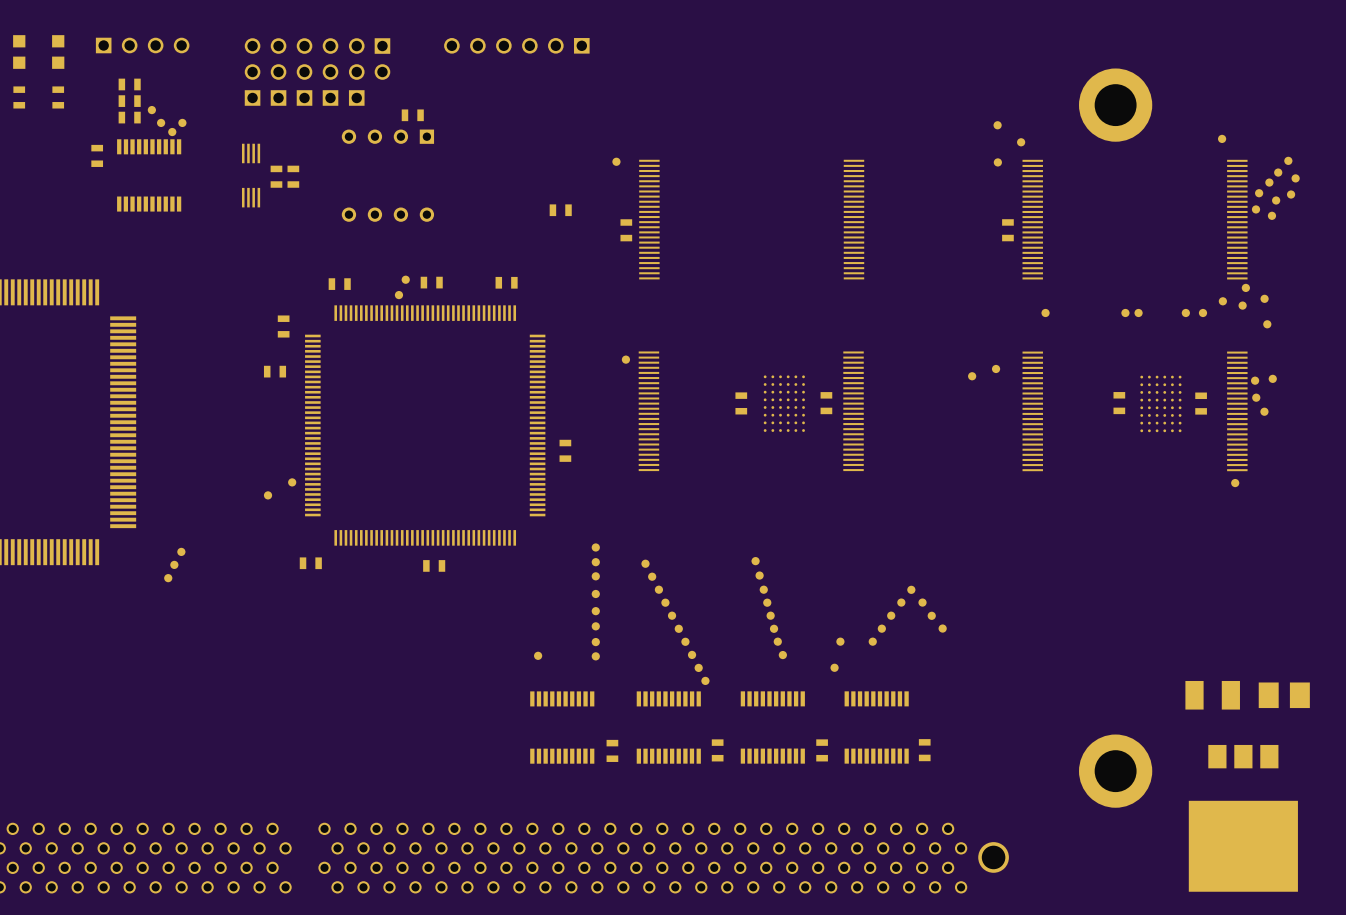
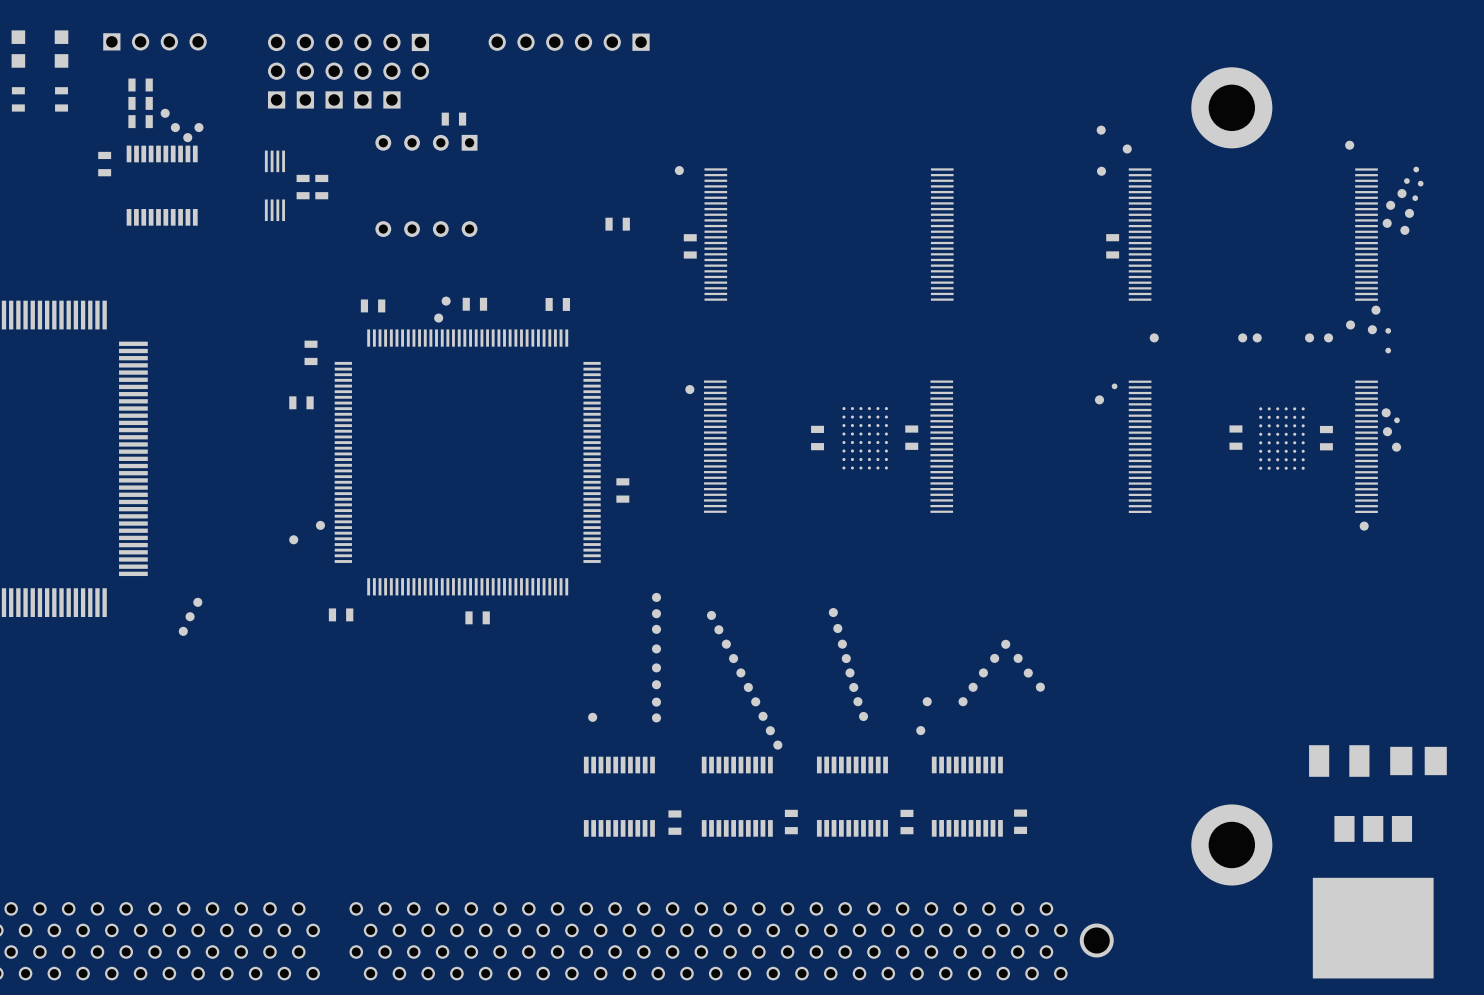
part: none -> (1416, 169)
part: (1288, 160) -> none
part: none -> (1406, 181)
part: (1278, 172) -> none
part: none -> (1420, 183)
part: (1295, 178) -> none
part: none -> (1415, 198)
part: (1291, 194) -> none
part: (1264, 298) -> none
part: none -> (1388, 330)
part: none -> (1388, 350)
part: (1267, 324) -> none
part: none -> (1114, 386)
part: (972, 376) -> none
part: (1272, 378) -> none
part: none -> (1396, 420)

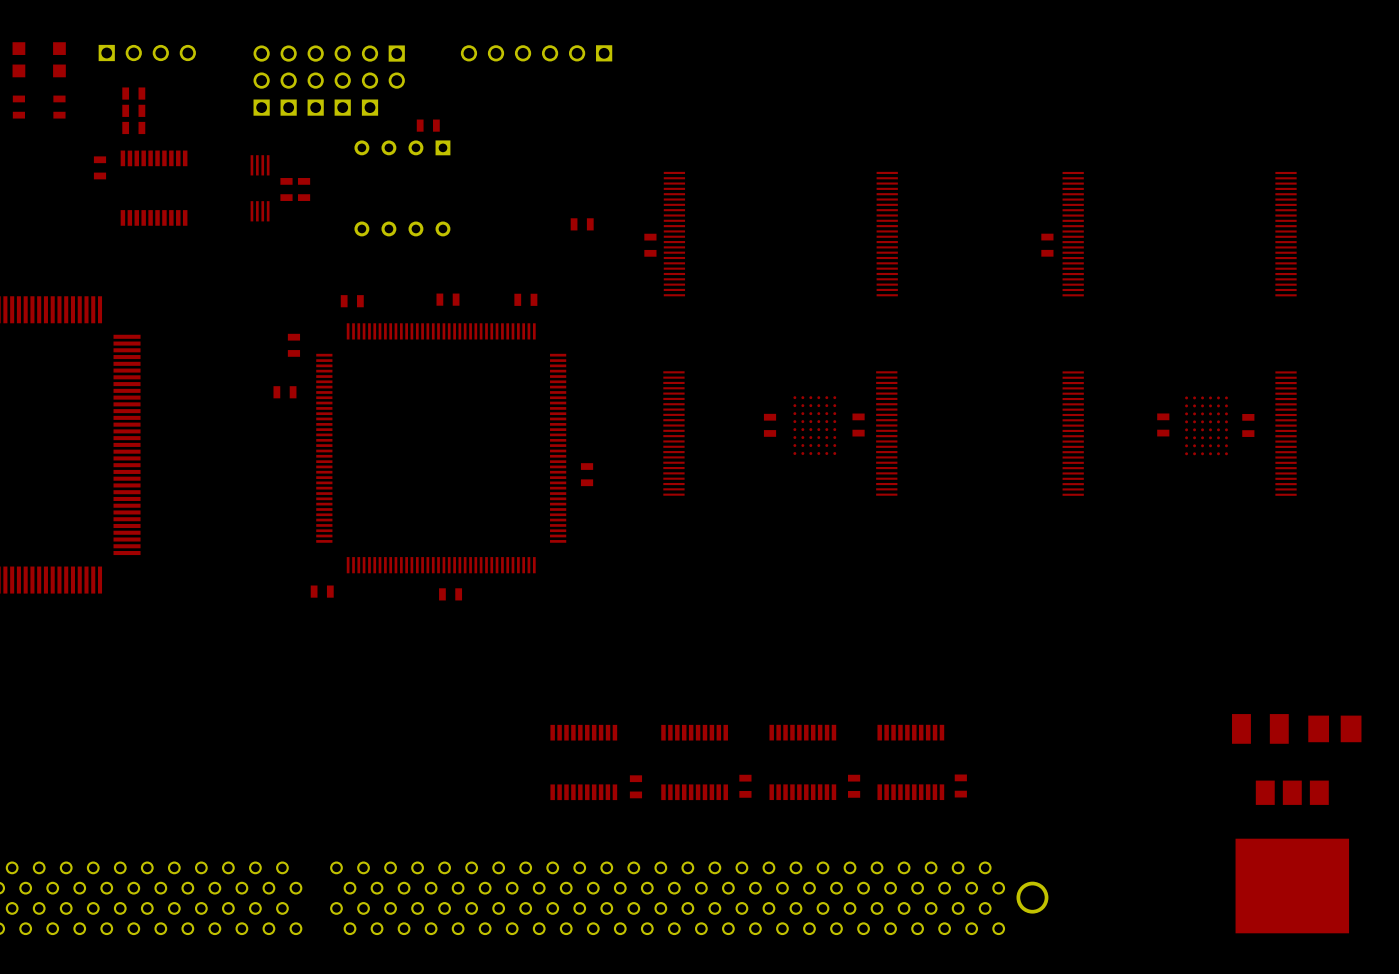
part: (1231, 107) -> none
part: (165, 113) -> none
part: (175, 127) -> none
part: (198, 127) -> none
part: (1101, 130) -> none
part: (187, 137) -> none
part: (1349, 145) -> none
part: (1127, 148) -> none
part: (1416, 169) -> none
part: (679, 170) -> none
part: (1101, 171) -> none
part: (1406, 181) -> none
part: (1420, 183) -> none
part: (1402, 193) -> none
part: (1415, 198) -> none
part: (1390, 205) -> none
part: (1409, 213) -> none
part: (1387, 223) -> none
part: (1404, 230) -> none
part: (446, 301) -> none
part: (1375, 310) -> none
part: (438, 318) -> none
part: (1350, 324) -> none
part: (1372, 329) -> none
part: (1388, 330) -> none
part: (1154, 337) -> none
part: (1242, 337) -> none
part: (1257, 337) -> none
part: (1309, 337) -> none
part: (1328, 337) -> none
part: (1388, 350) -> none
part: (1114, 386) -> none
part: (689, 389) -> none
part: (1099, 399) -> none
part: (1386, 412) -> none
part: (1396, 420) -> none
part: (1387, 431) -> none
part: (1396, 447) -> none
part: (320, 525) -> none
part: (1364, 526) -> none
part: (293, 539) -> none
part: (656, 597) -> none
part: (197, 602) -> none
part: (833, 612) -> none
part: (656, 613) -> none
part: (711, 615) -> none
part: (190, 616) -> none
part: (837, 628) -> none
part: (656, 629) -> none
part: (718, 629) -> none
part: (183, 631) -> none
part: (726, 644) -> none
part: (842, 644) -> none
part: (1005, 644) -> none
part: (656, 648) -> none
part: (733, 658) -> none
part: (846, 658) -> none
part: (994, 658) -> none
part: (1018, 658) -> none
part: (656, 667) -> none
part: (740, 672) -> none
part: (850, 672) -> none
part: (983, 672) -> none
part: (1028, 673) -> none
part: (656, 684) -> none
part: (748, 687) -> none
part: (853, 687) -> none
part: (973, 687) -> none
part: (1040, 687) -> none
part: (755, 701) -> none
part: (857, 701) -> none
part: (927, 701) -> none
part: (963, 701) -> none
part: (656, 702) -> none
part: (763, 716) -> none
part: (863, 716) -> none
part: (592, 717) -> none
part: (656, 717) -> none
part: (770, 730) -> none
part: (920, 730) -> none
part: (777, 745) -> none
part: (1231, 844) -> none

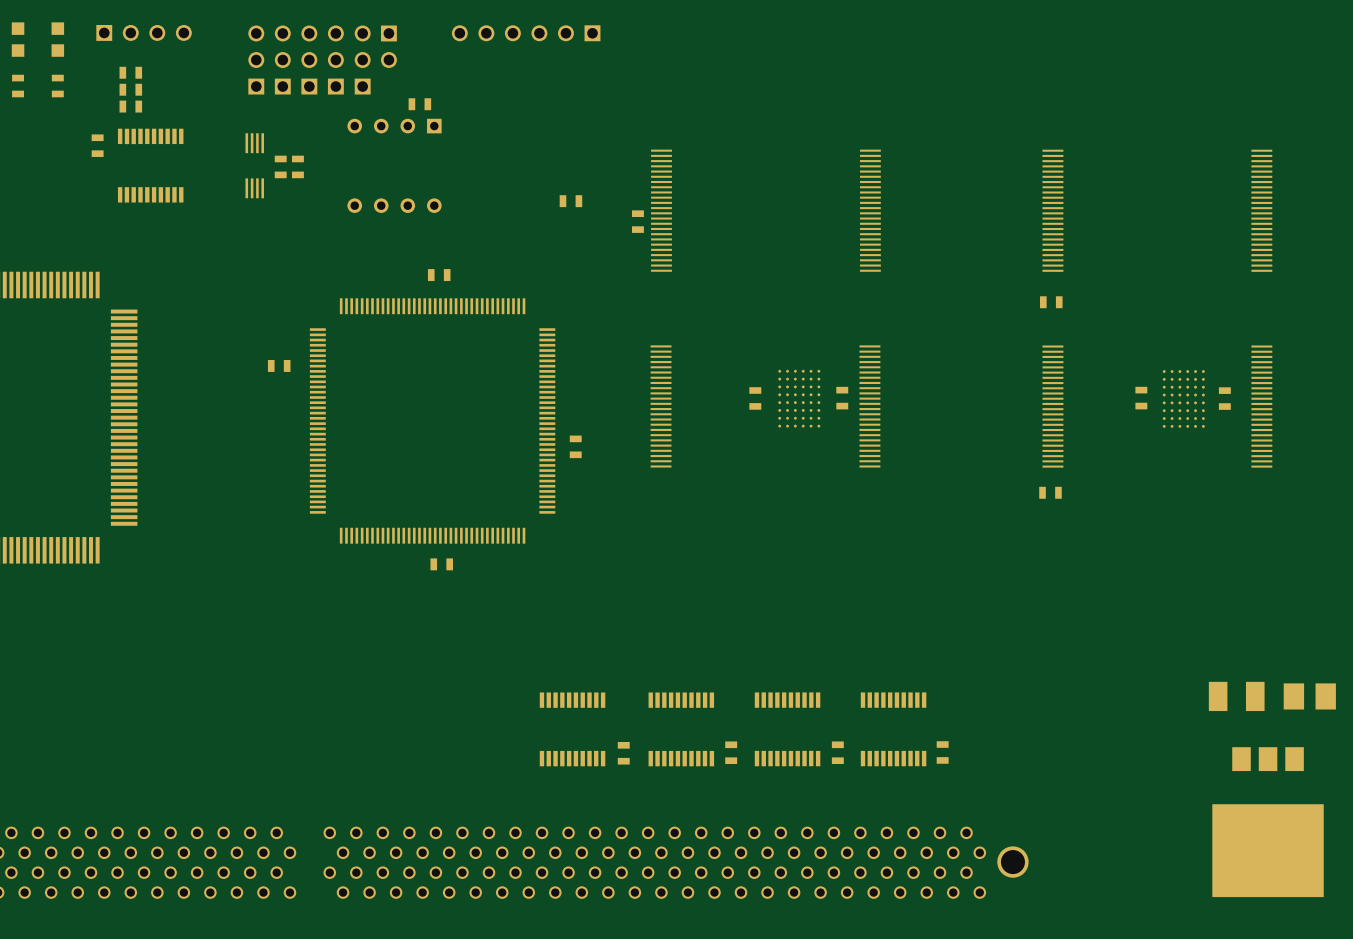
part rotation: 0° (1047, 245) -> 90° clockwise (1051, 302)
part position: (1047, 245) -> (1051, 302)
part: (525, 299) -> none
part: (352, 301) -> none
part: (293, 345) -> none
part: none -> (1050, 492)
part: (322, 591) -> none

